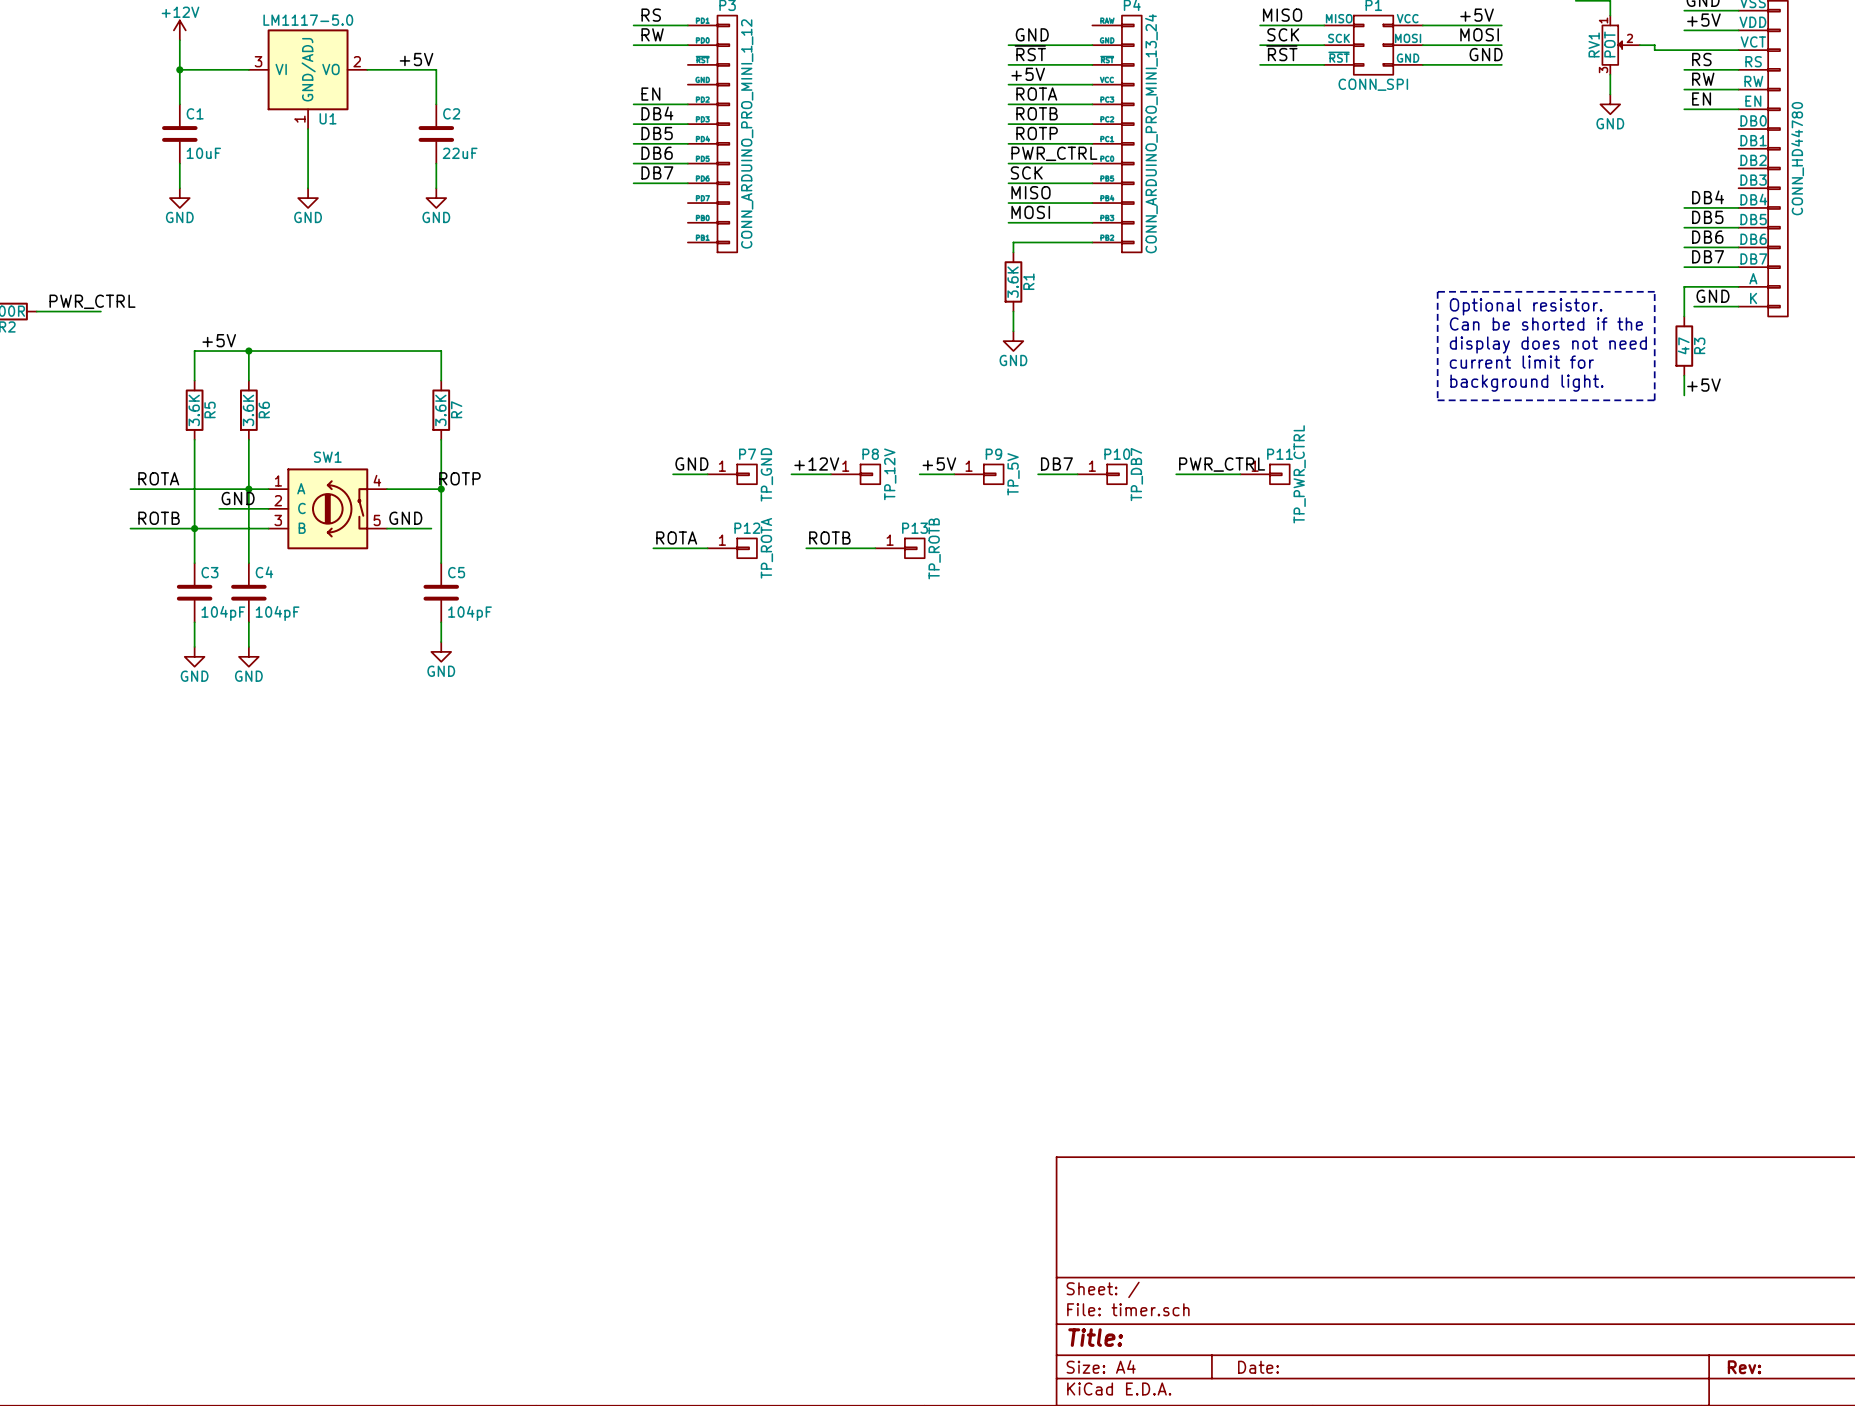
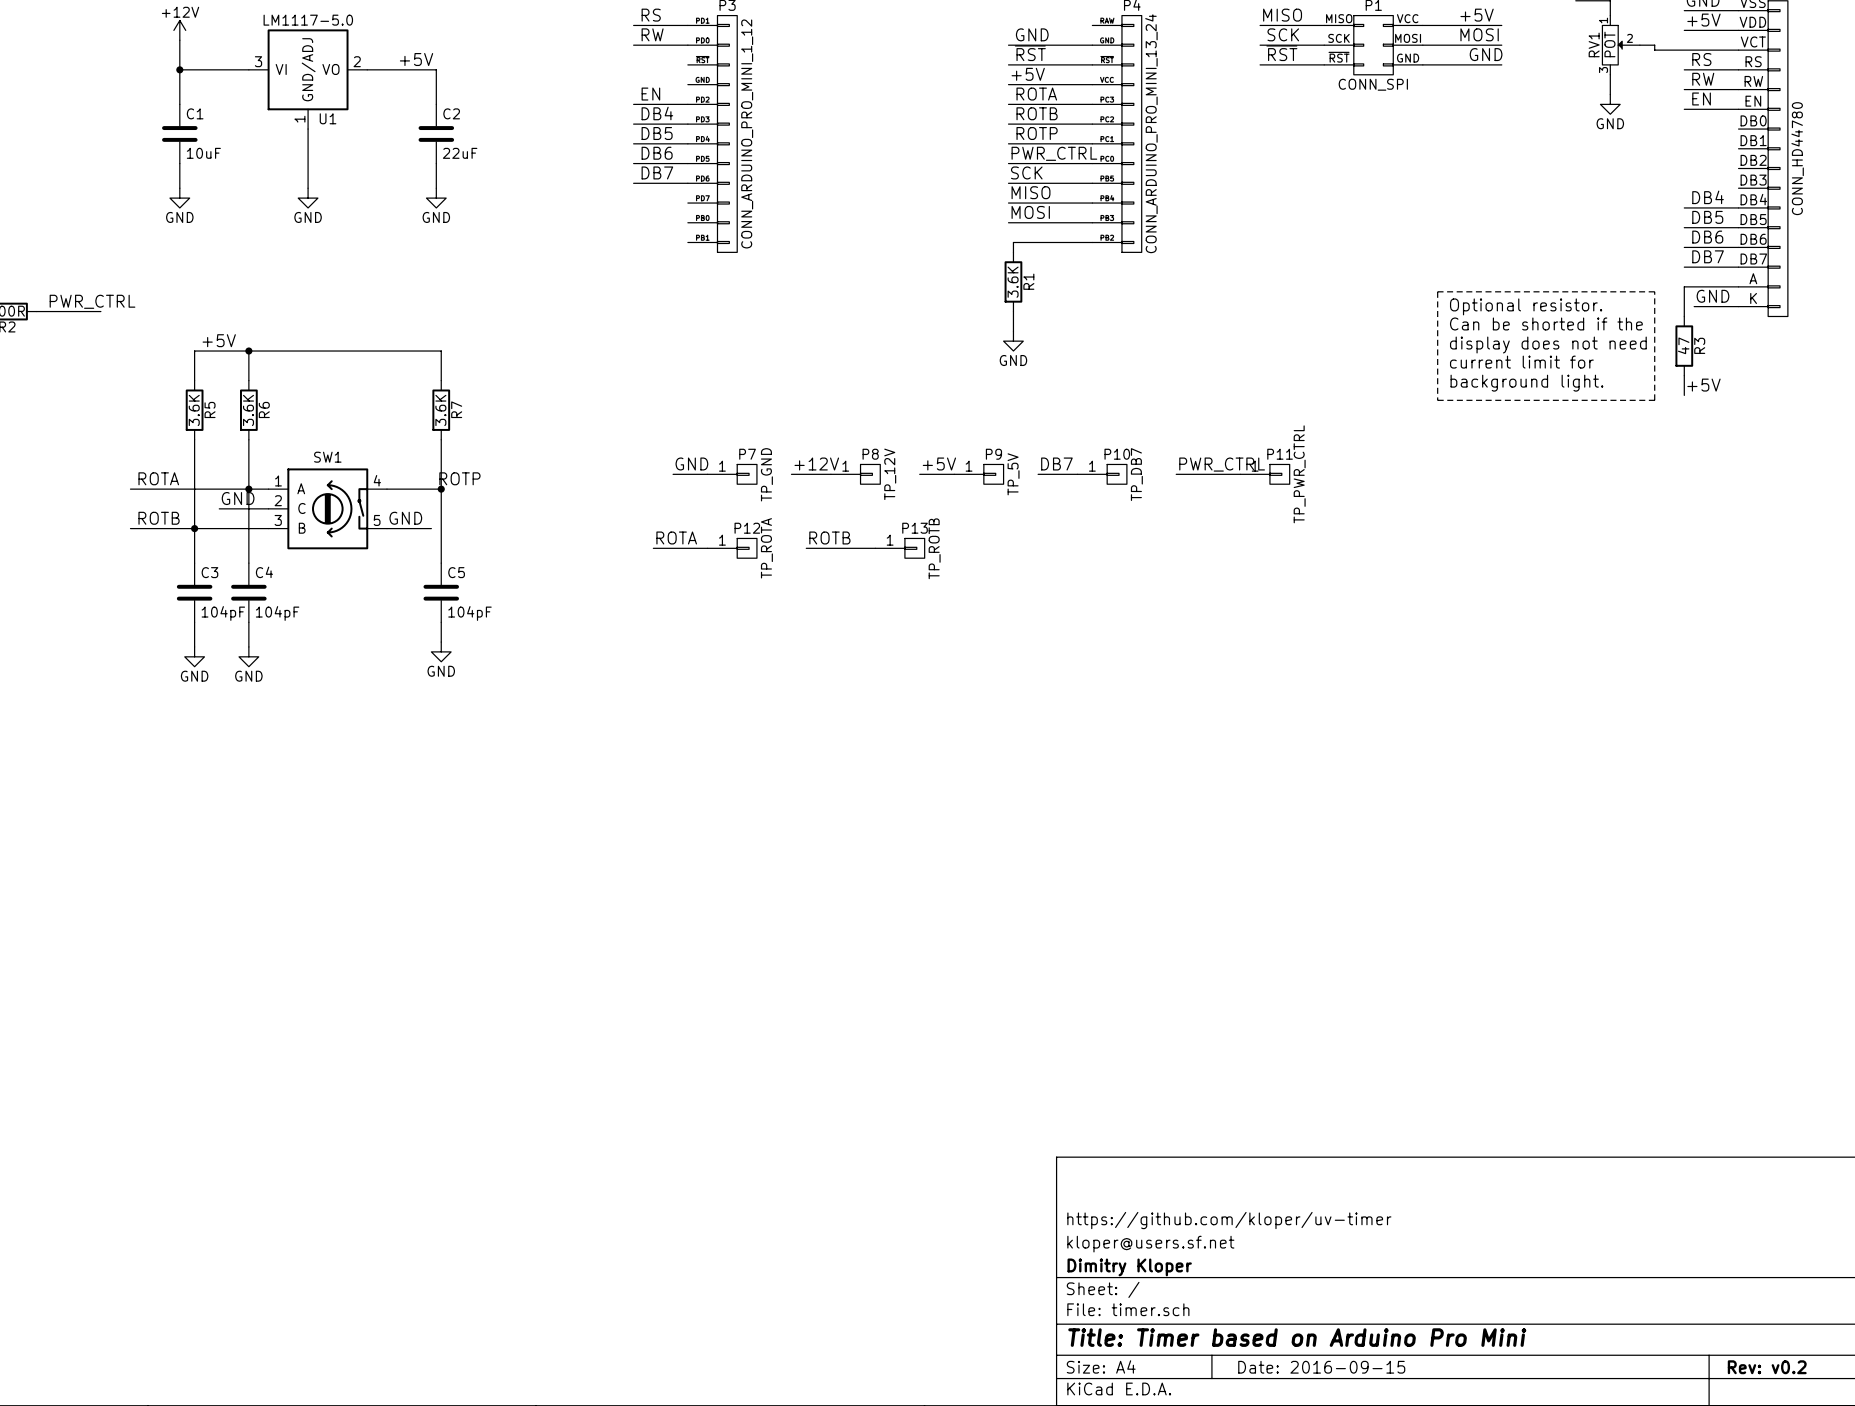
title block: none -> https://github.com/kloper/uv-timer (1229, 1220)
title block: none -> kloper@users.sf.net (1150, 1244)
title block: none -> Dimitry Kloper (1129, 1267)
title block: Title: (1095, 1337) -> Title: Timer based on Arduino Pro Mini (1297, 1337)
title block: Date: (1258, 1367) -> Date: 2016-09-15 (1321, 1367)
title block: Rev: (1744, 1367) -> Rev: v0.2 (1767, 1367)

